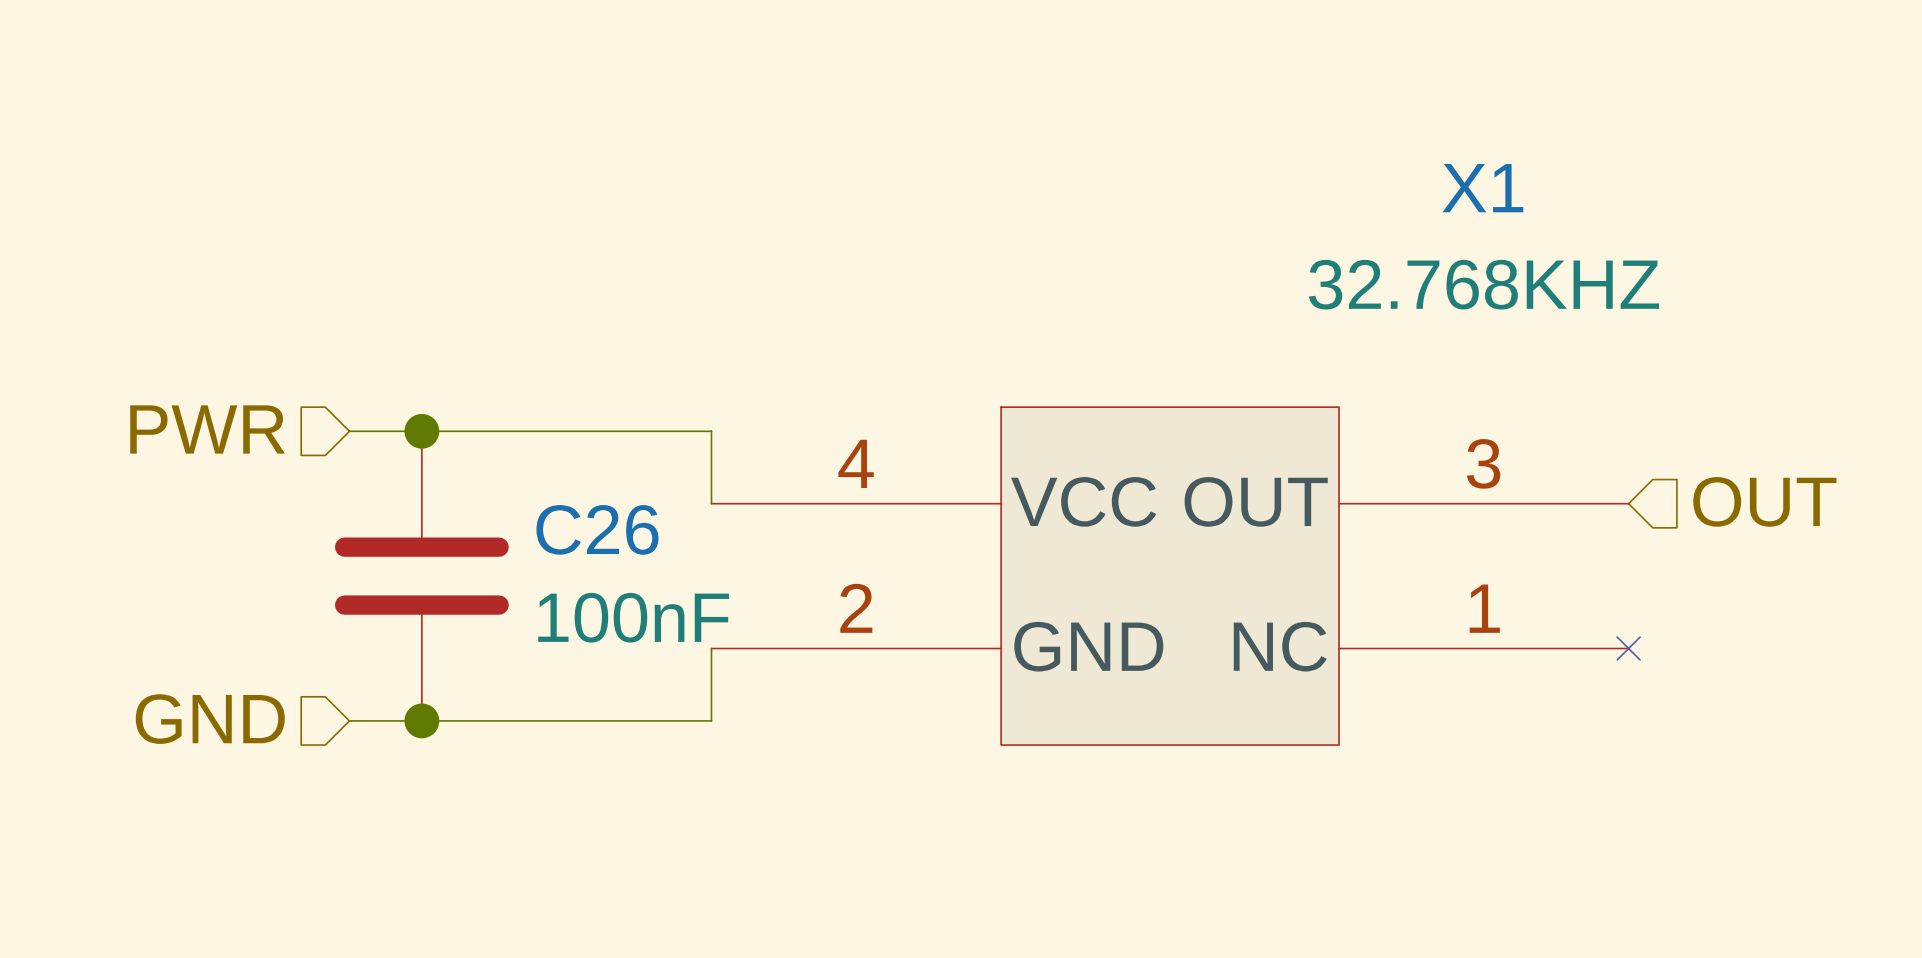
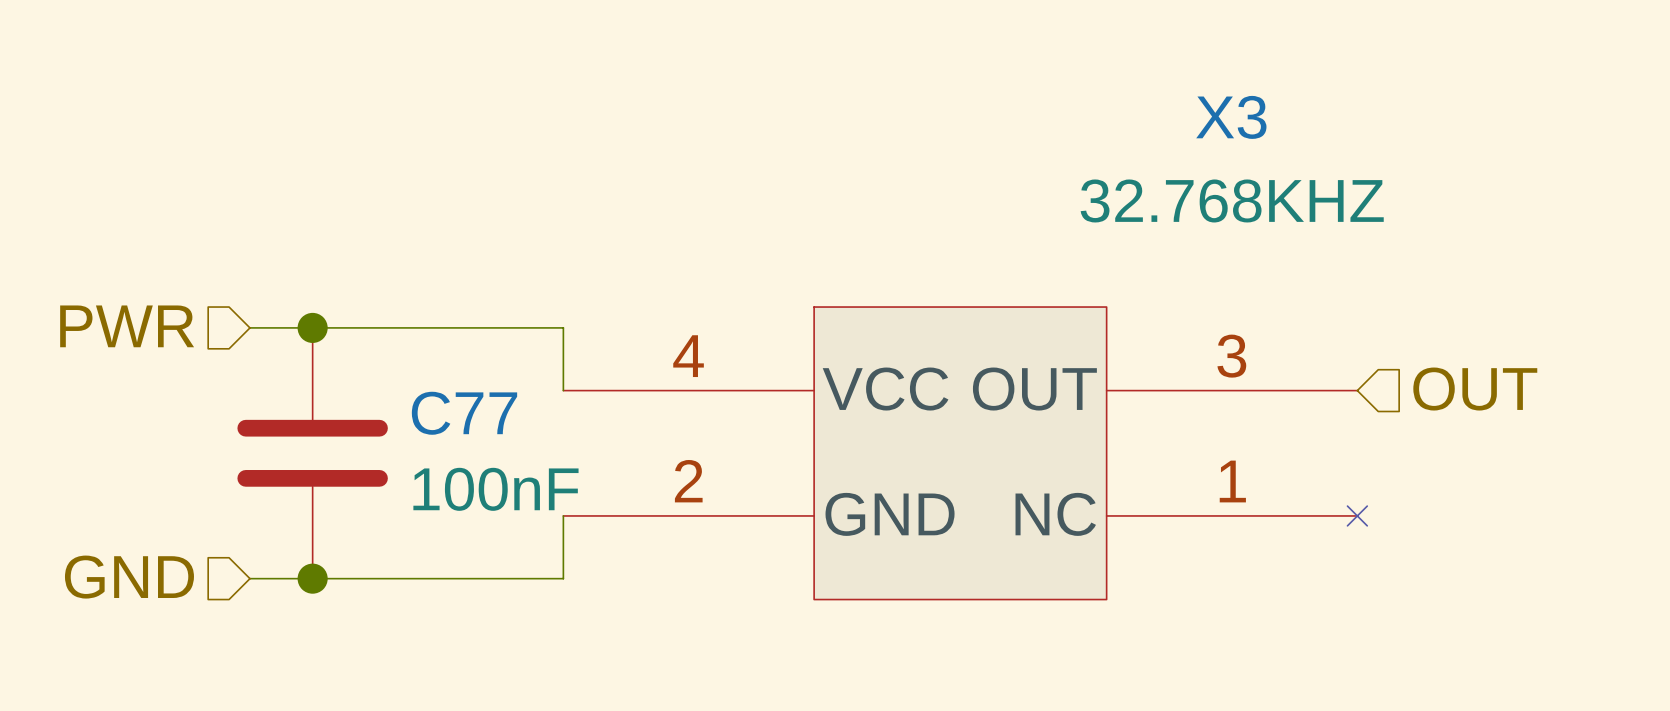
X1 name: X1 (1482, 188) -> X3 (1231, 117)
C26 name: C26 (597, 529) -> C77 (464, 413)

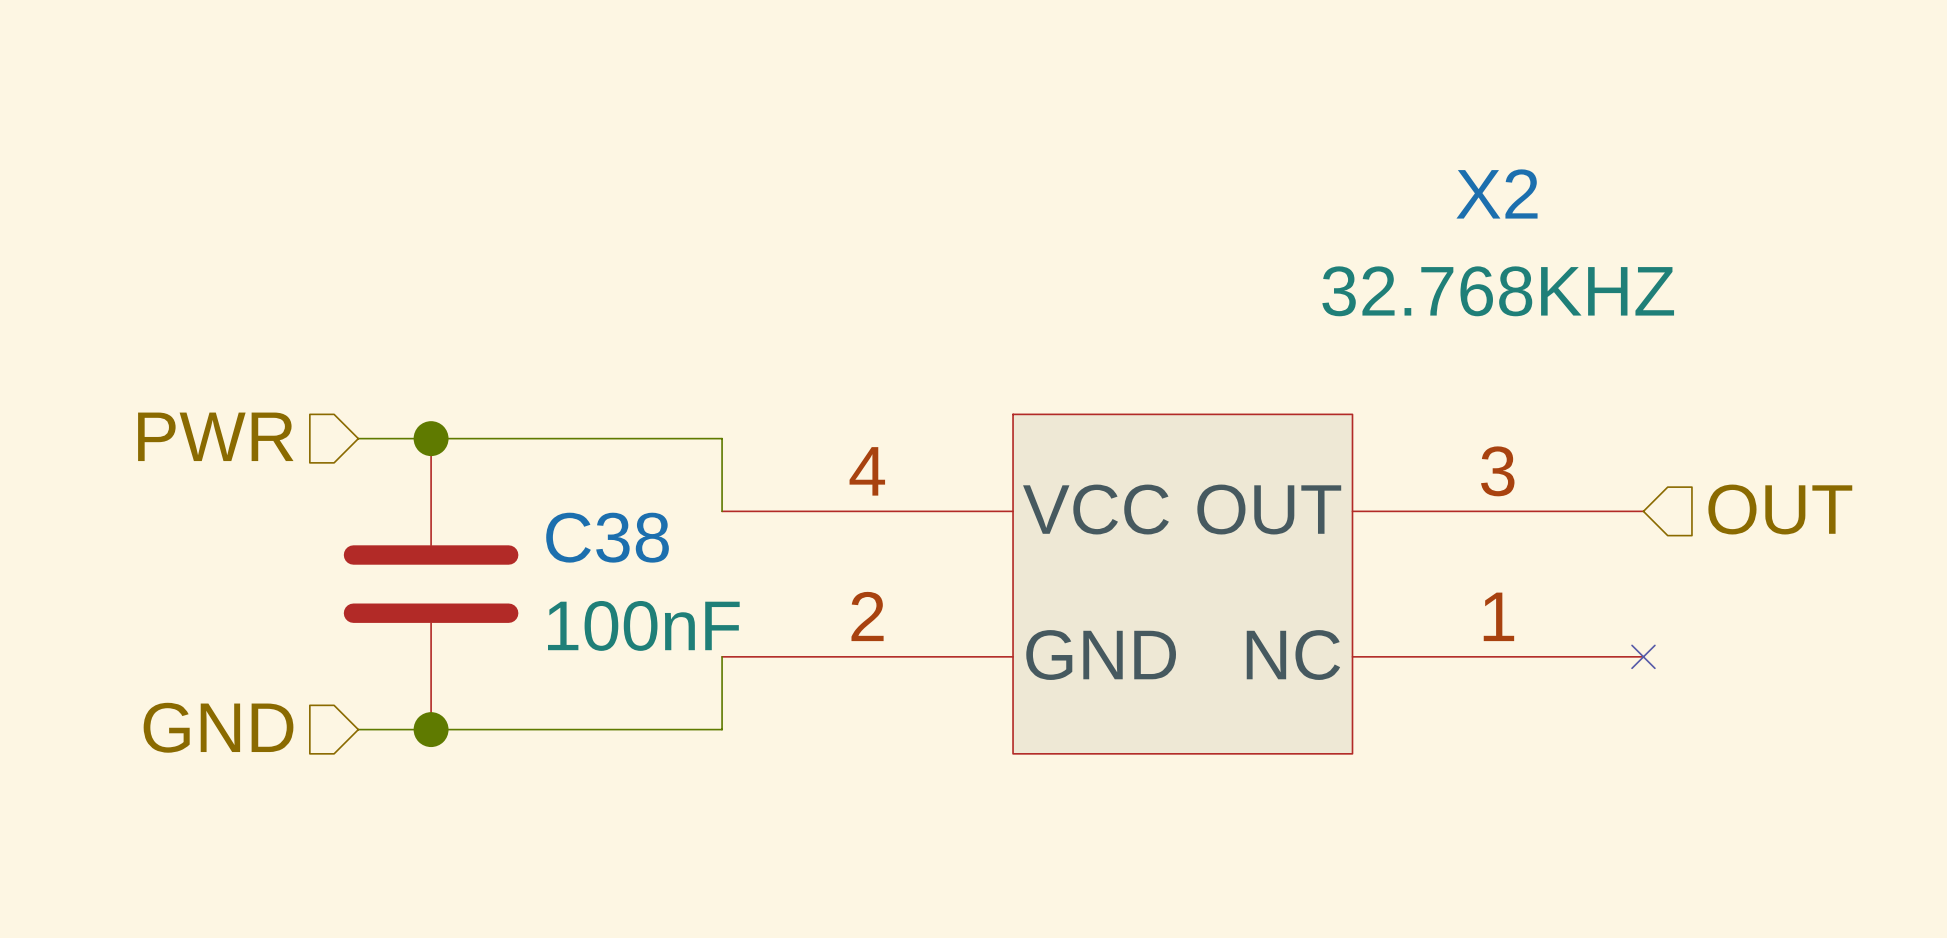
X3 name: X3 (1231, 117) -> X2 (1497, 193)
C77 name: C77 (464, 413) -> C38 (607, 537)

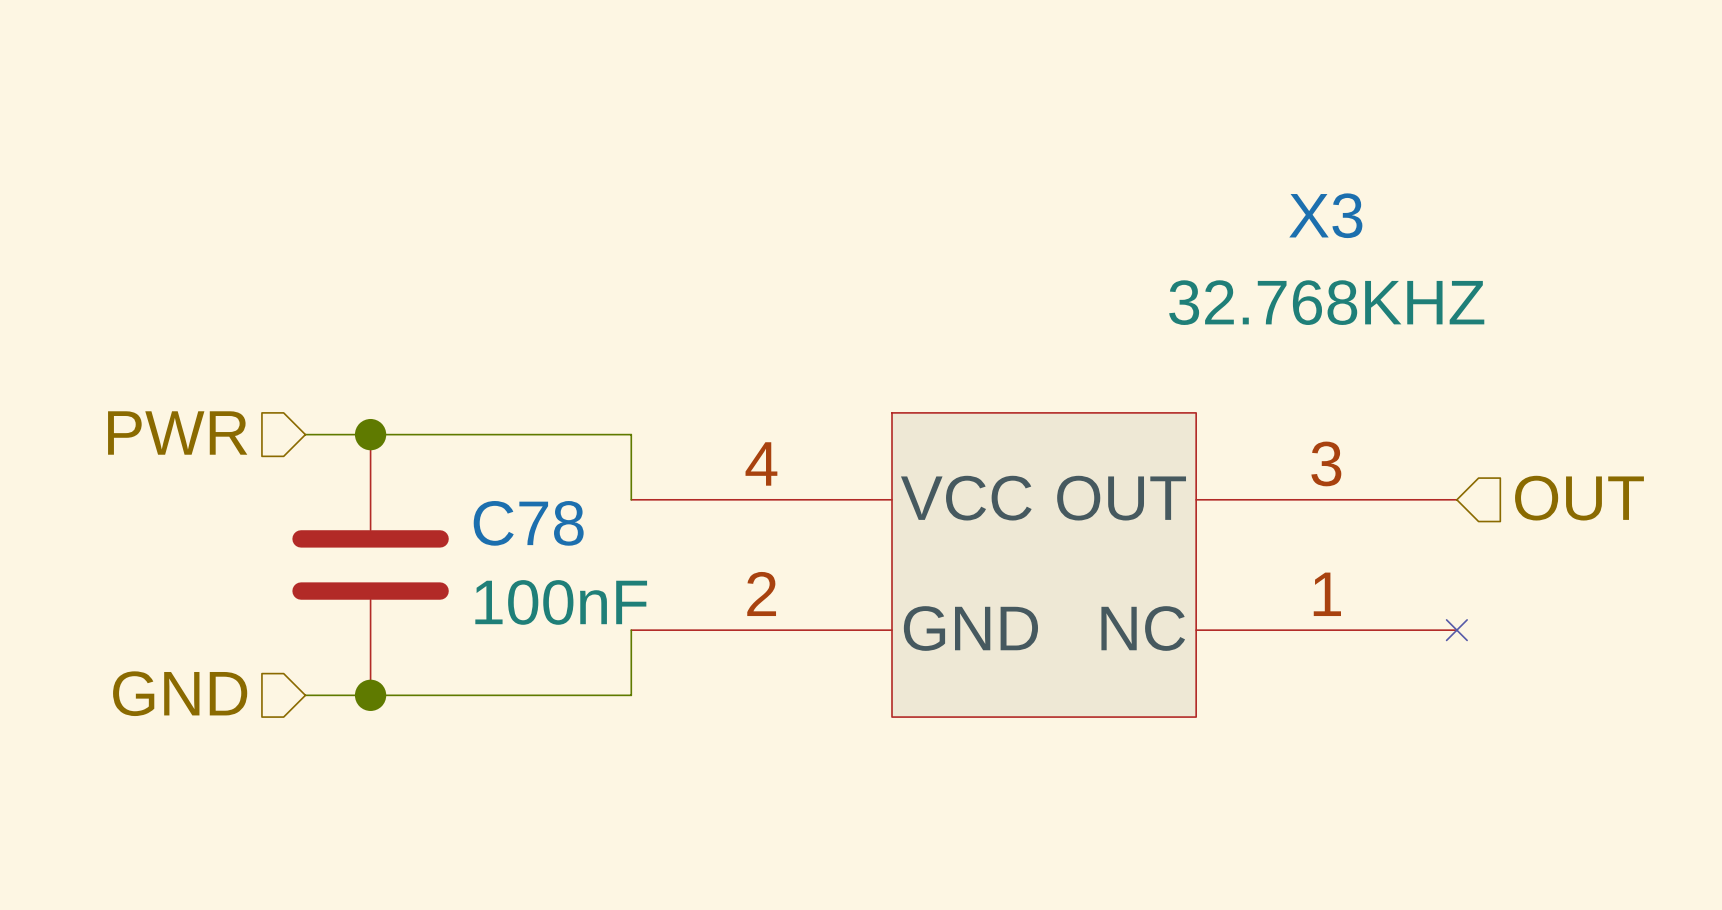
X2 name: X2 (1497, 193) -> X3 (1325, 215)
C38 name: C38 (607, 537) -> C78 (528, 523)

